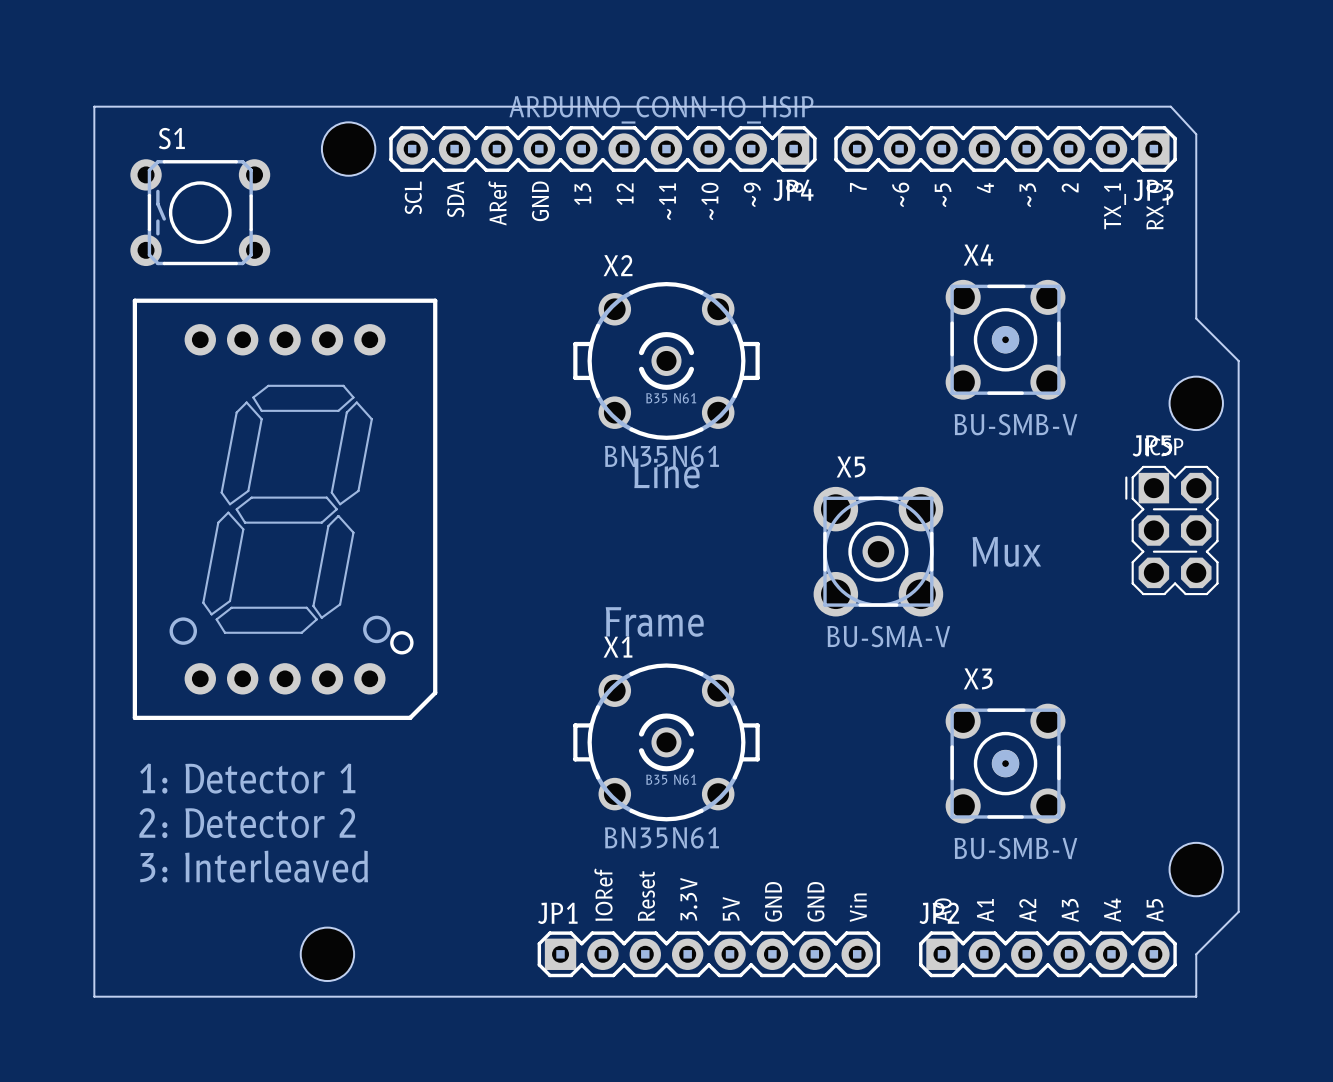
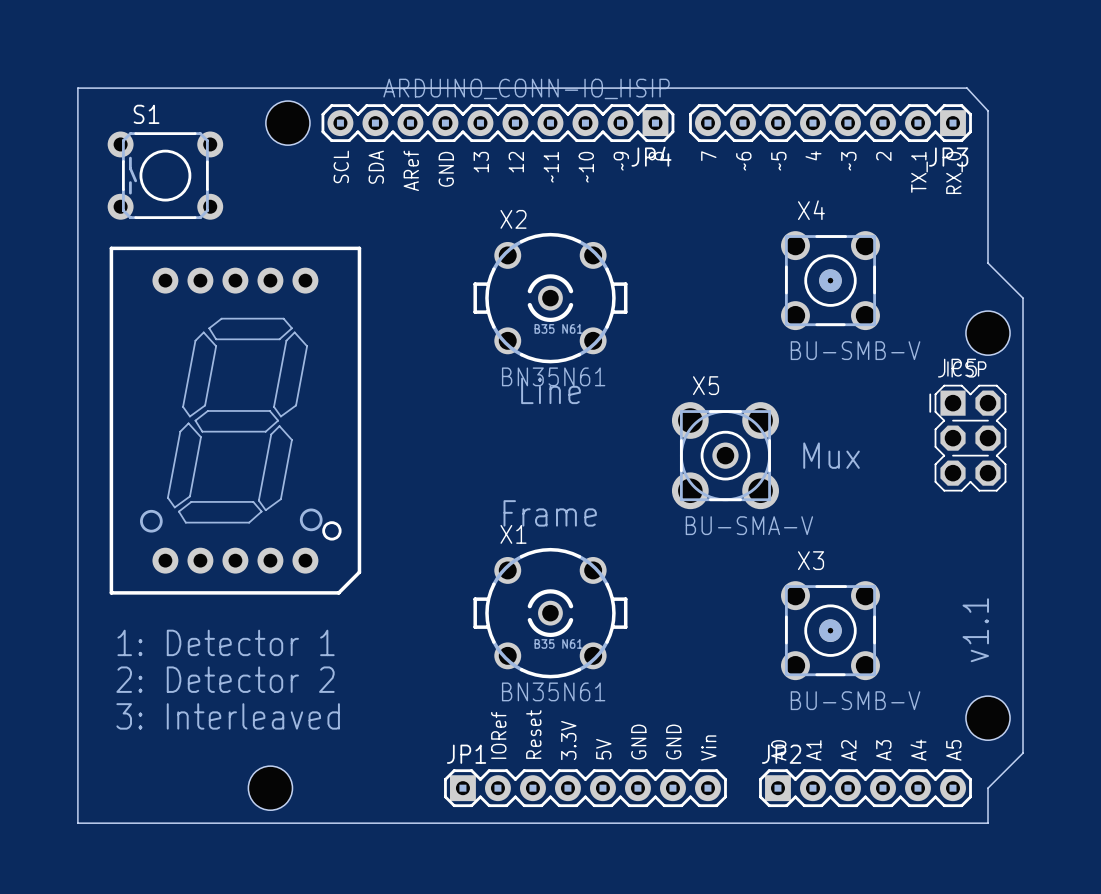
text: none -> v1.1 (975, 630)

